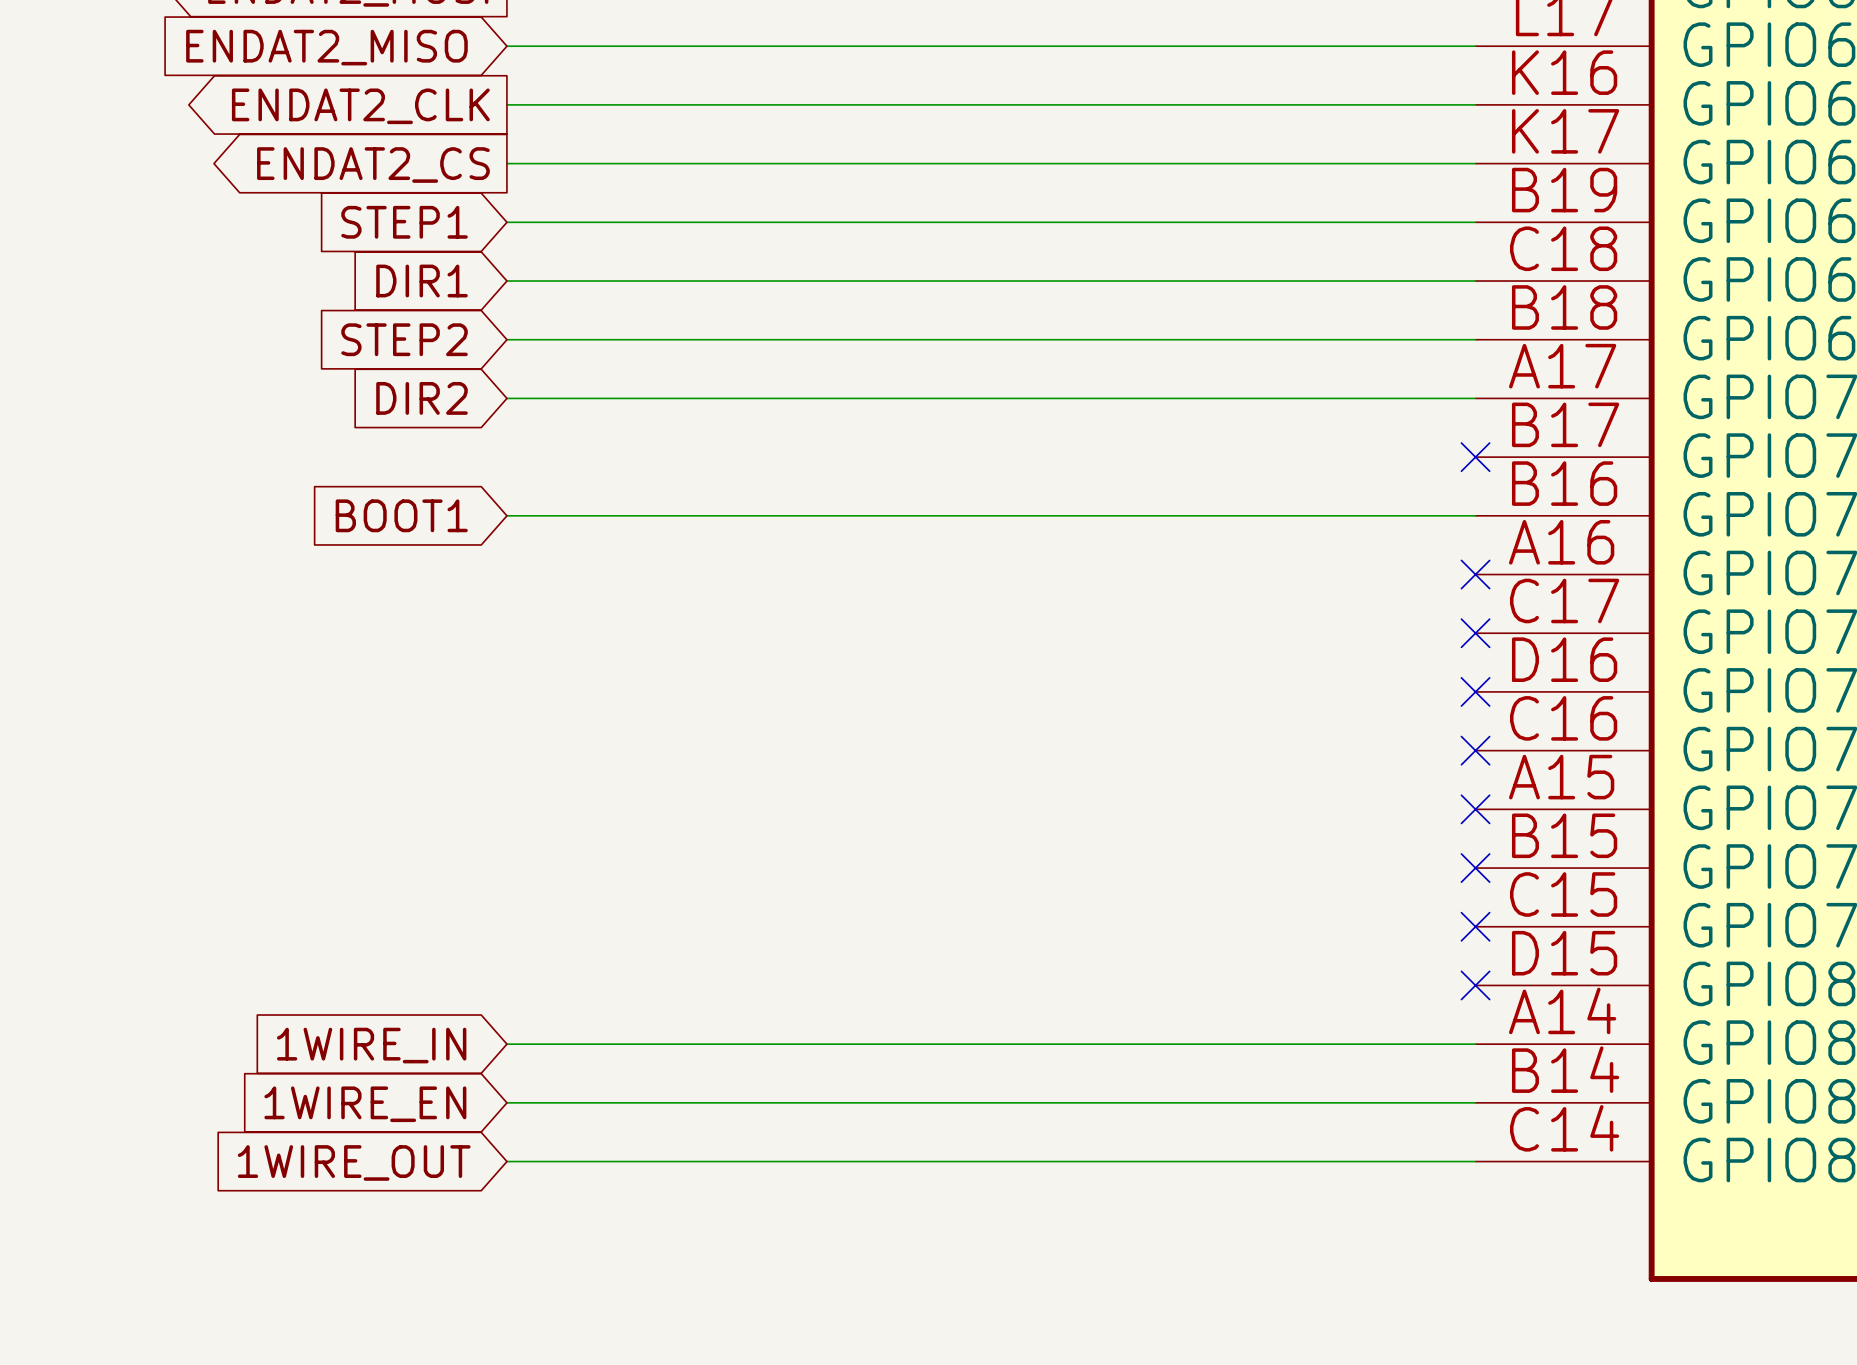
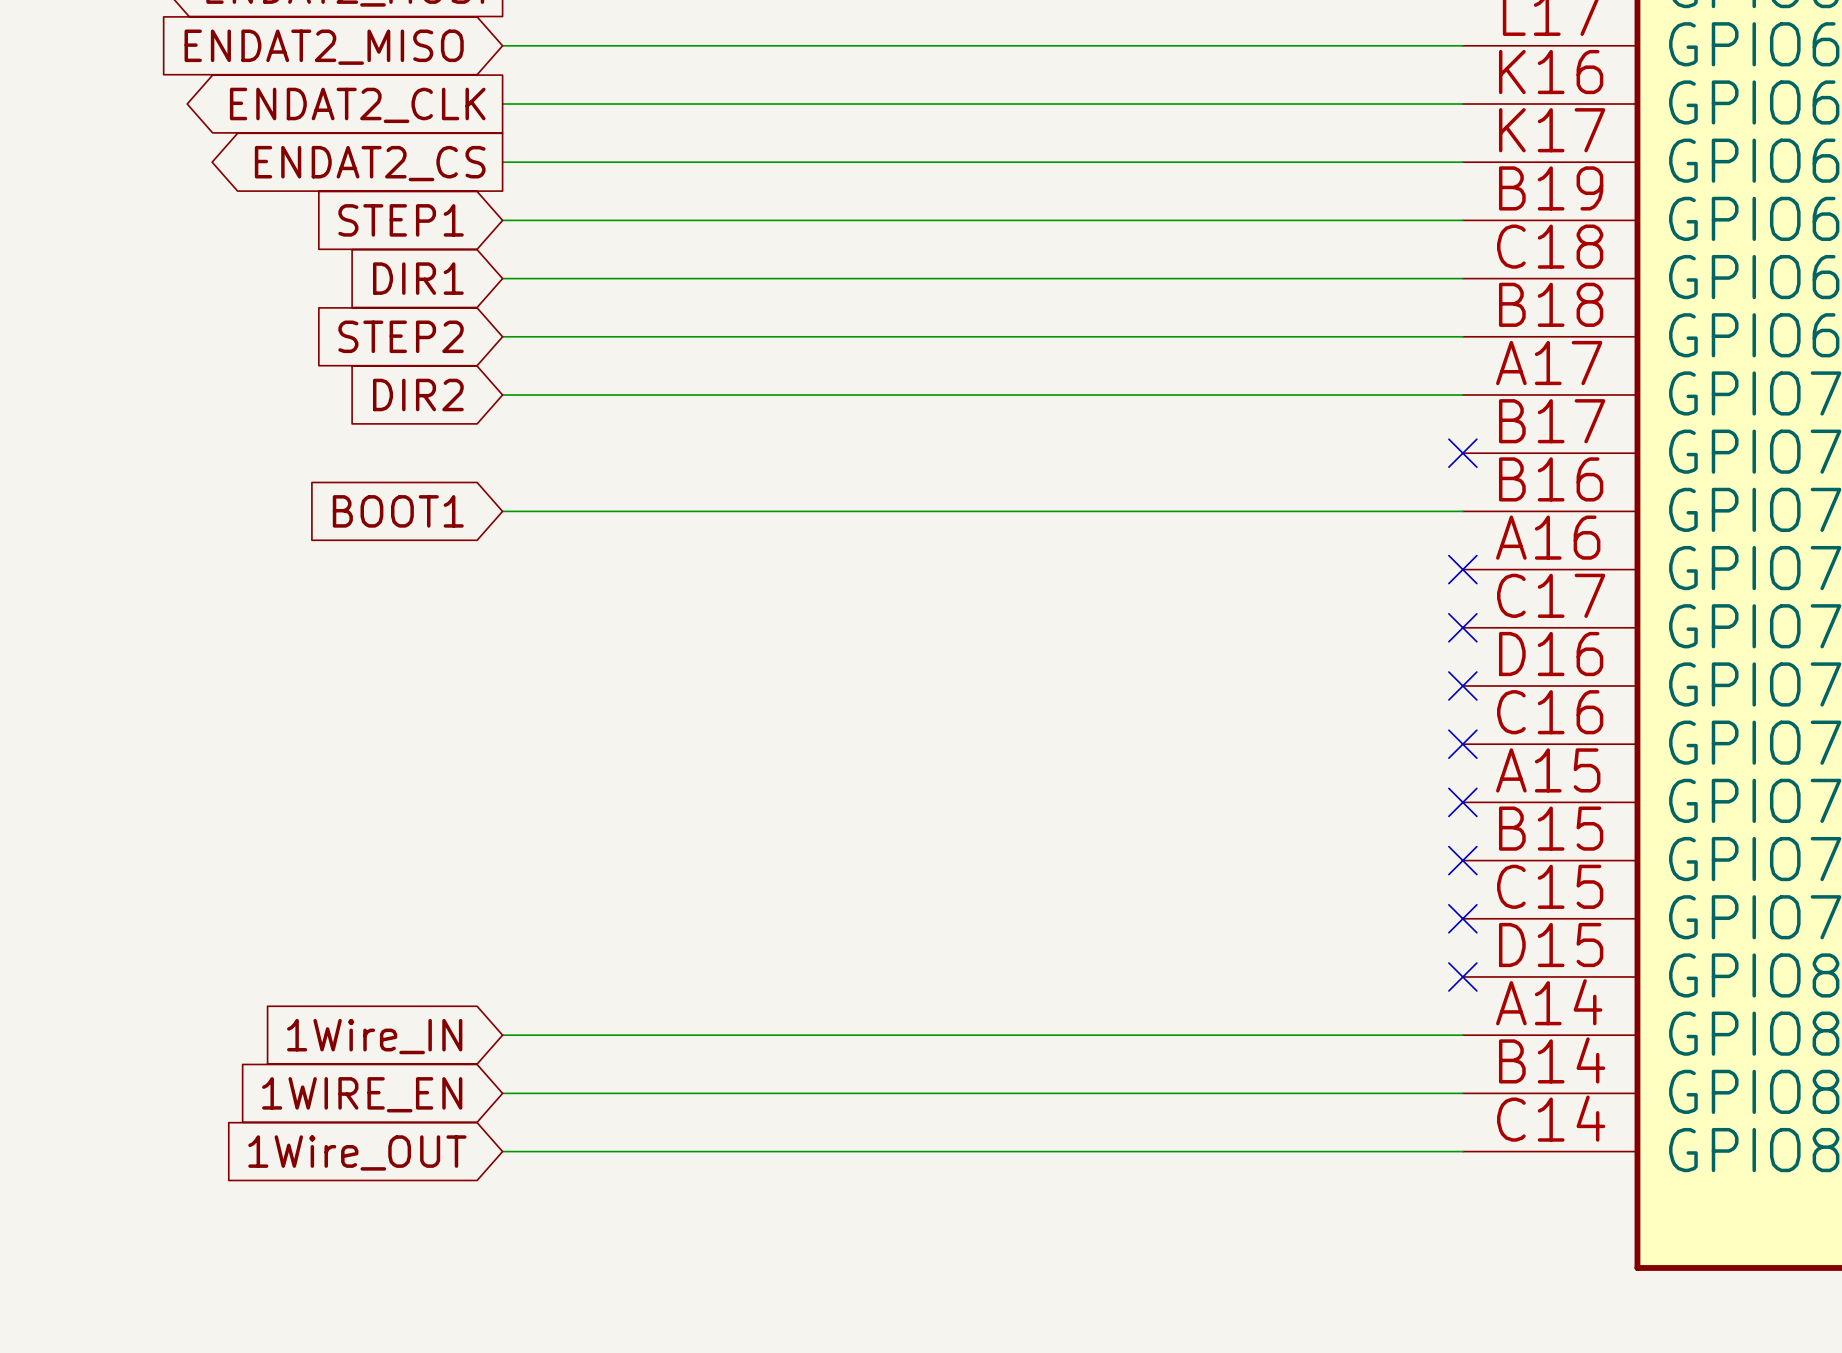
global label: 1WIRE_IN (371, 1045) -> 1Wire_IN (374, 1036)
global label: 1WIRE_OUT (354, 1162) -> 1Wire_OUT (357, 1152)

